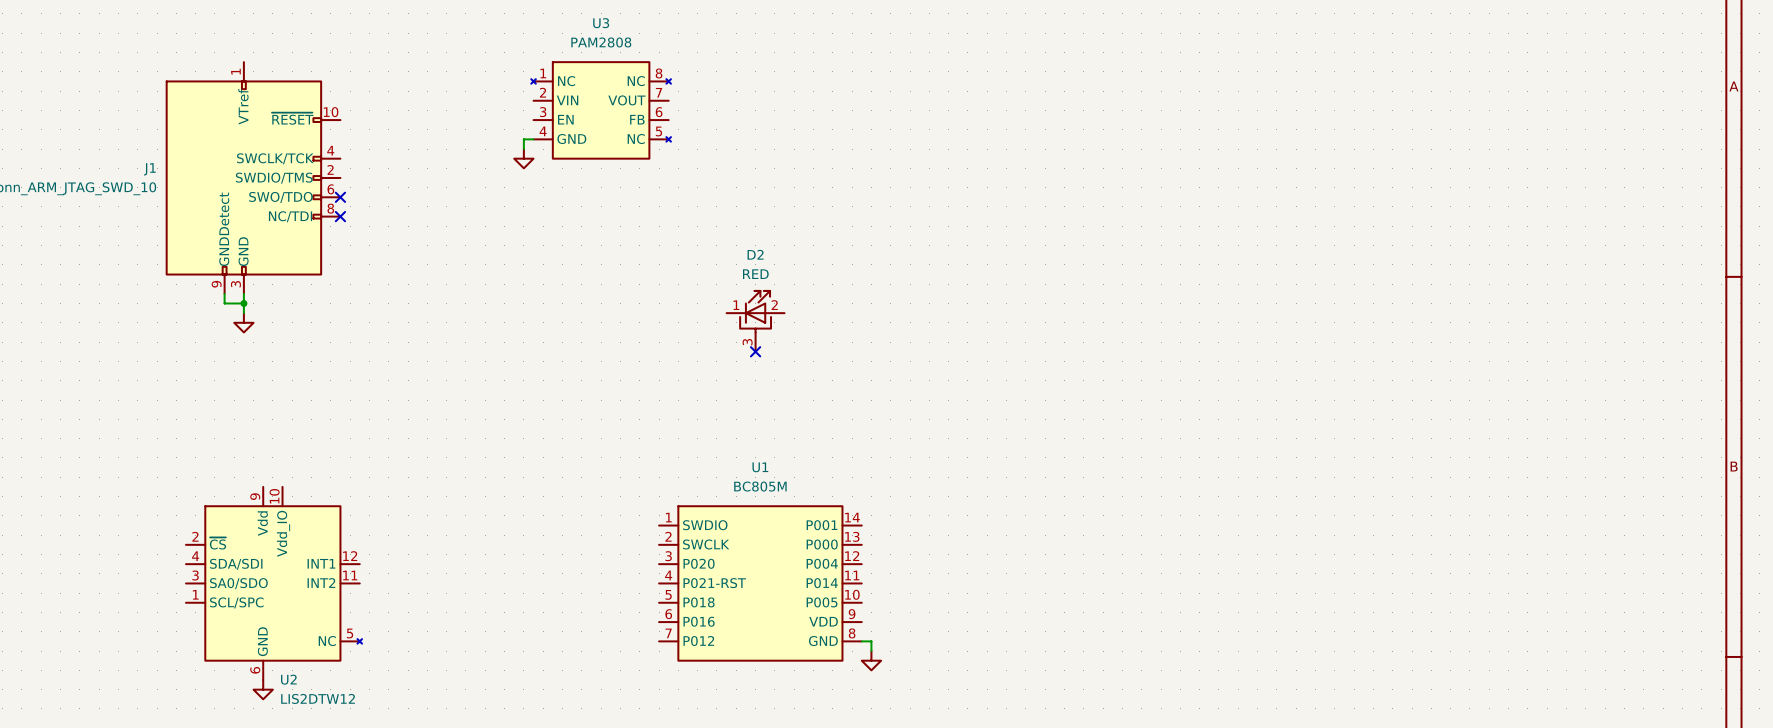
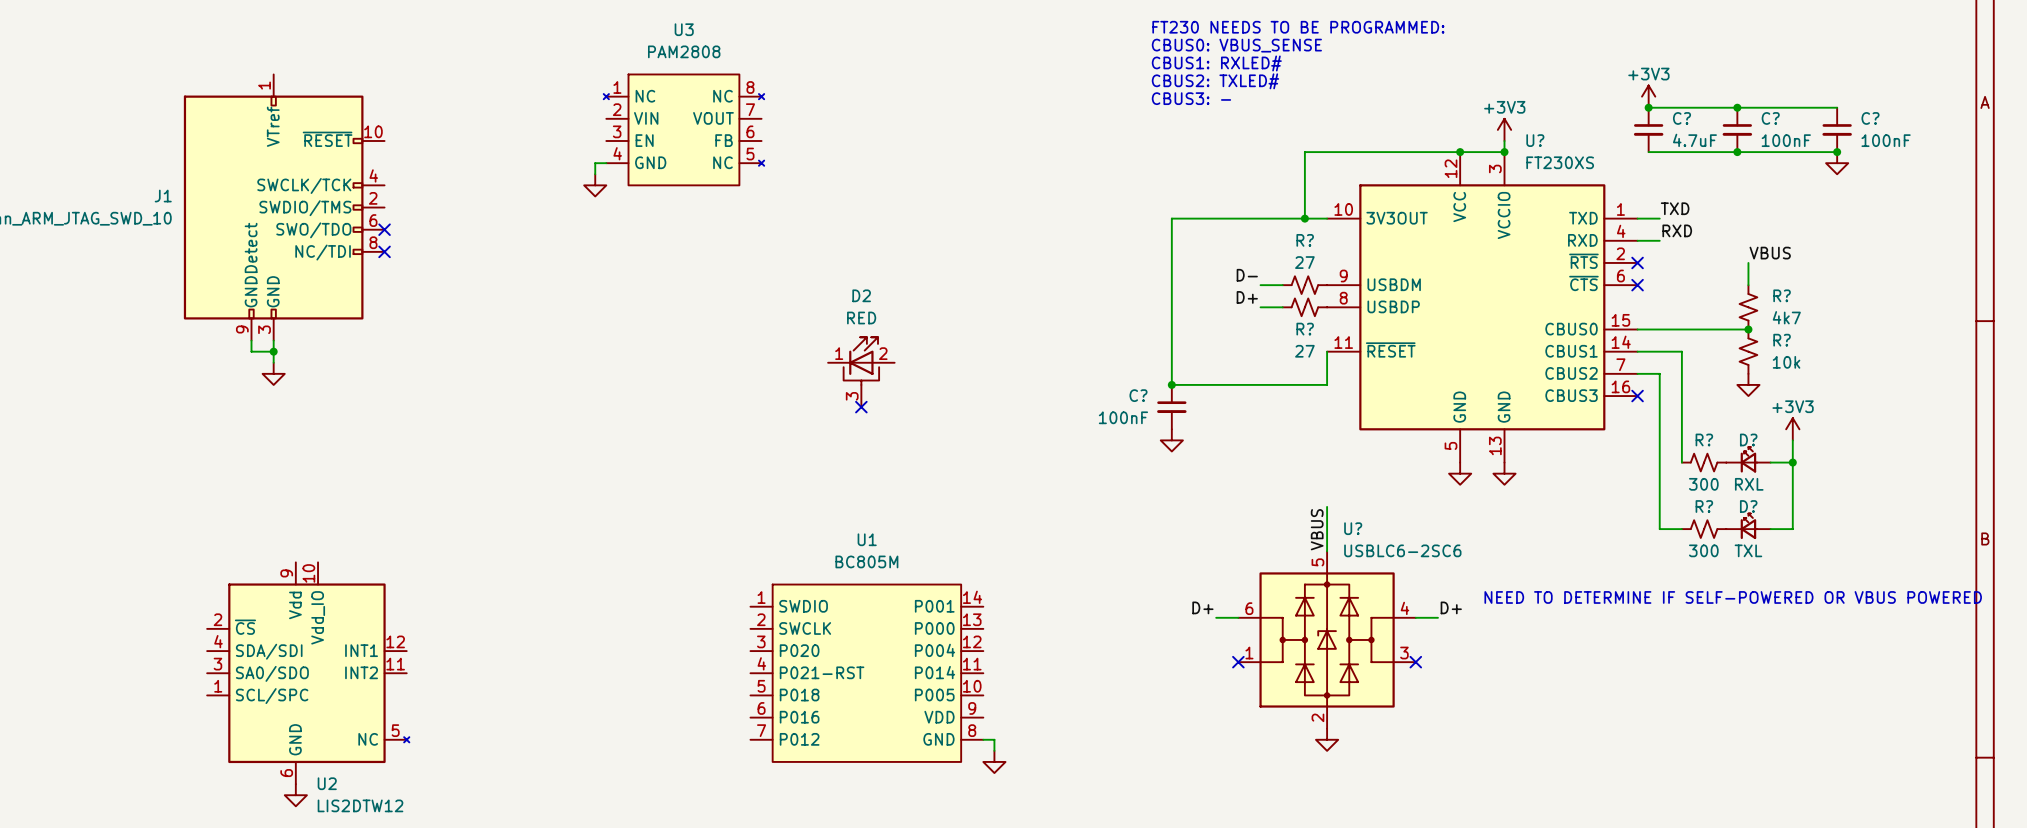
text: none -> FT230 NEEDS TO BE PROGRAMMED: (1298, 27)
text: none -> CBUS0: VBUS_SENSE (1236, 45)
text: none -> CBUS1: RXLED# (1216, 63)
text: none -> CBUS2: TXLED# (1215, 81)
power symbol: none -> +3V3 (1648, 96)
text: none -> CBUS3: - (1191, 98)
wire: none -> (1648, 107) (1837, 107)
junction: none -> (1648, 107)
junction: none -> (1737, 107)
power symbol: none -> +3V3 (1504, 129)
C?: none -> 4.7uF (1648, 129)
C?: none -> 100nF (1737, 129)
C?: none -> 100nF (1837, 129)
wire: none -> (1504, 141) (1504, 152) (1304, 152) (1304, 218)
junction: none -> (1460, 152)
junction: none -> (1504, 152)
wire: none -> (1648, 152) (1837, 152)
junction: none -> (1737, 152)
junction: none -> (1837, 152)
power symbol: none -> (1837, 163)
label: none -> TXD (1675, 208)
junction: none -> (1304, 218)
wire: none -> (1327, 218) (1171, 218) (1171, 384) (1327, 384) (1327, 351)
wire: none -> (1637, 218) (1659, 218)
label: none -> RXD (1677, 230)
wire: none -> (1637, 240) (1659, 240)
label: none -> VBUS (1770, 253)
no-connect mark: none -> (1637, 262)
wire: none -> (1748, 262) (1748, 285)
label: none -> D- (1247, 275)
wire: none -> (1260, 285) (1282, 285)
R?: none -> 27 (1304, 285)
no-connect mark: none -> (1637, 285)
label: none -> D+ (1247, 297)
wire: none -> (1260, 307) (1282, 307)
R?: none -> 27 (1304, 307)
U?: none -> FT230XS (1482, 307)
R?: none -> 4k7 (1748, 307)
wire: none -> (1637, 329) (1748, 329)
junction: none -> (1748, 329)
wire: none -> (1637, 351) (1681, 351) (1681, 462)
R?: none -> 10k (1748, 351)
wire: none -> (1637, 373) (1659, 373) (1659, 529) (1681, 529)
junction: none -> (1171, 384)
power symbol: none -> (1748, 384)
no-connect mark: none -> (1637, 396)
C?: none -> 100nF (1171, 407)
power symbol: none -> +3V3 (1792, 429)
power symbol: none -> (1171, 440)
wire: none -> (1792, 440) (1792, 529) (1770, 529)
D?: none -> RXL (1748, 459)
R?: none -> 300 (1704, 462)
wire: none -> (1770, 462) (1792, 462)
junction: none -> (1792, 462)
power symbol: none -> (1460, 473)
power symbol: none -> (1504, 473)
wire: none -> (1327, 506) (1327, 551)
D?: none -> TXL (1748, 526)
label: none -> VBUS (1317, 529)
R?: none -> 300 (1704, 529)
text: none -> NEED TO DETERMINE IF SELF-POWERED OR VBUS POWERED (1733, 597)
label: none -> D+ (1202, 607)
label: none -> D+ (1451, 607)
wire: none -> (1216, 617) (1238, 617)
wire: none -> (1415, 617) (1437, 617)
U?: none -> USBLC6-2SC6 (1327, 639)
no-connect mark: none -> (1238, 662)
no-connect mark: none -> (1415, 662)
power symbol: none -> (1327, 739)

